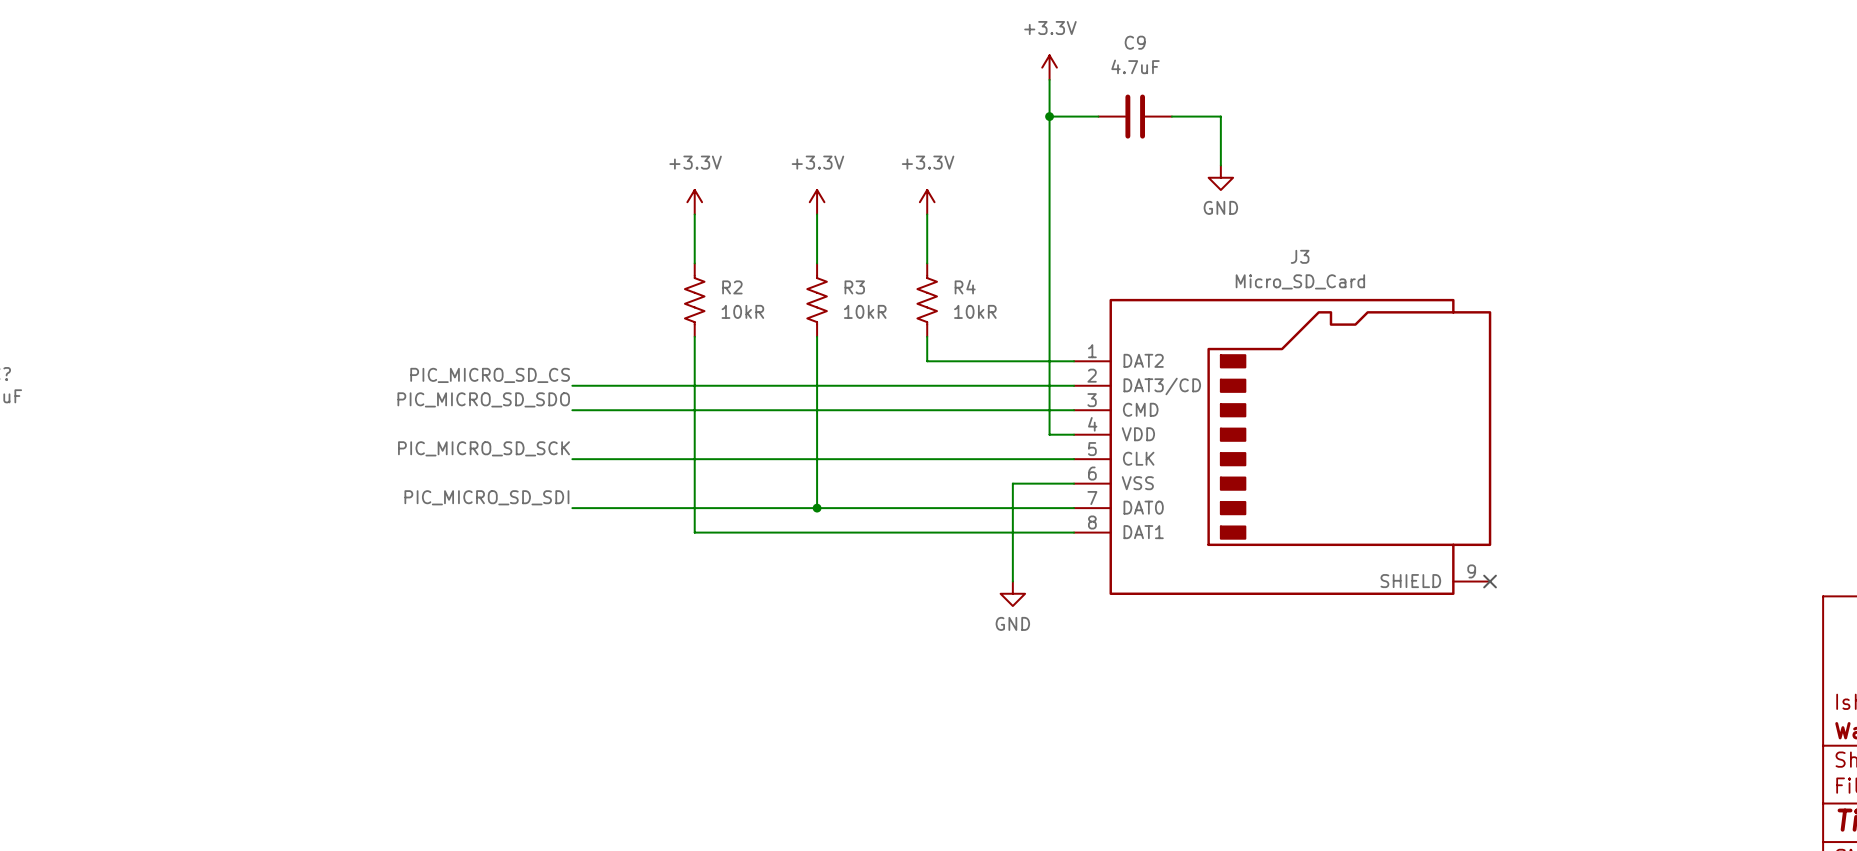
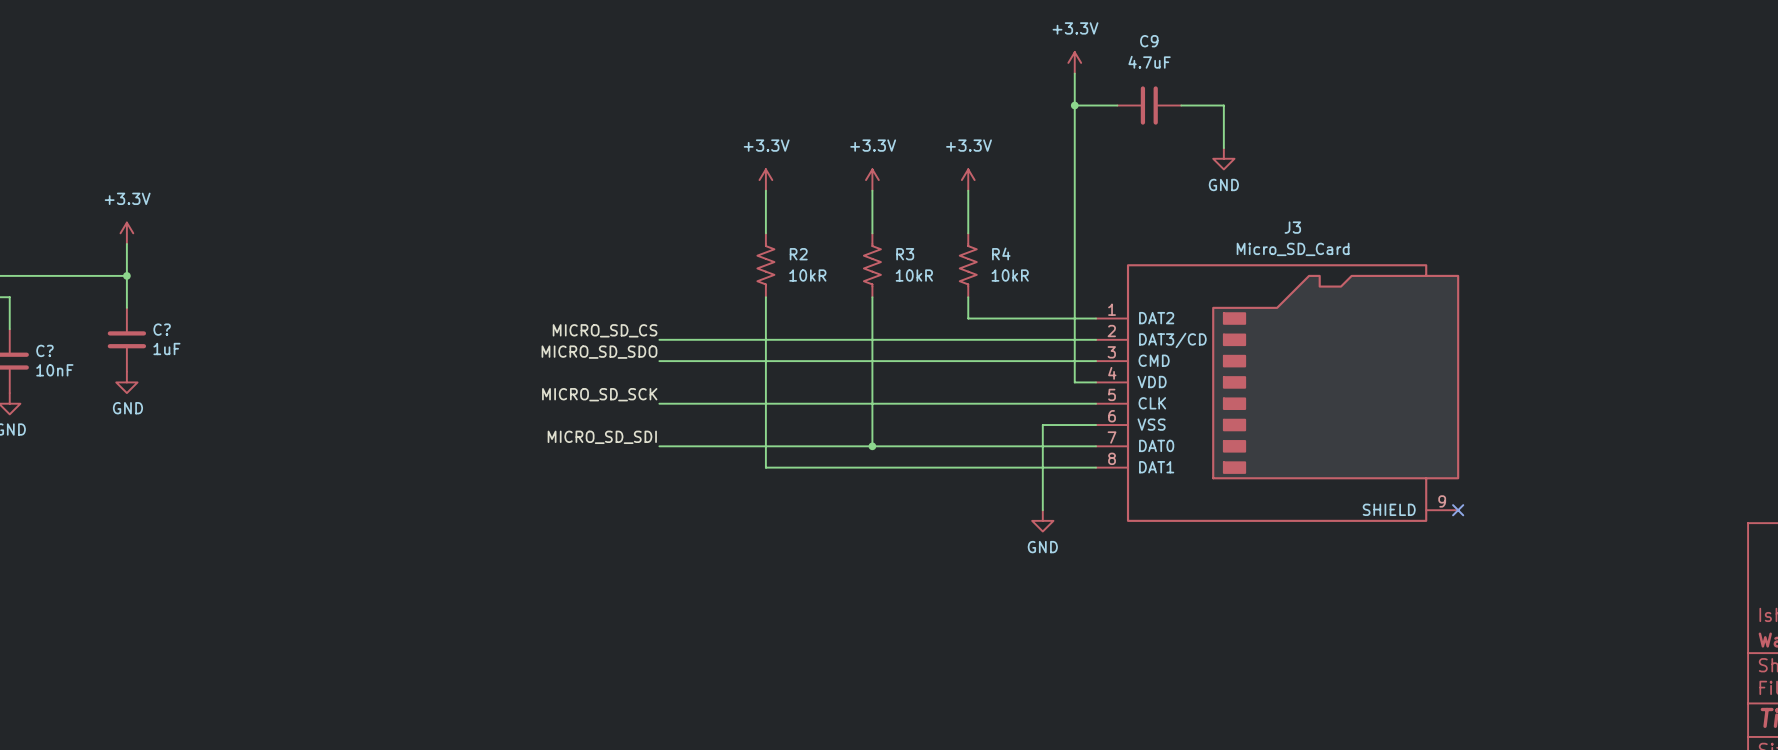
label: PIC_MICRO_SD_CS (490, 375) -> MICRO_SD_CS (605, 330)
label: PIC_MICRO_SD_SDO (483, 399) -> MICRO_SD_SDO (599, 352)
label: PIC_MICRO_SD_SCK (484, 448) -> MICRO_SD_SCK (599, 394)
label: PIC_MICRO_SD_SDI (486, 497) -> MICRO_SD_SDI (602, 437)

